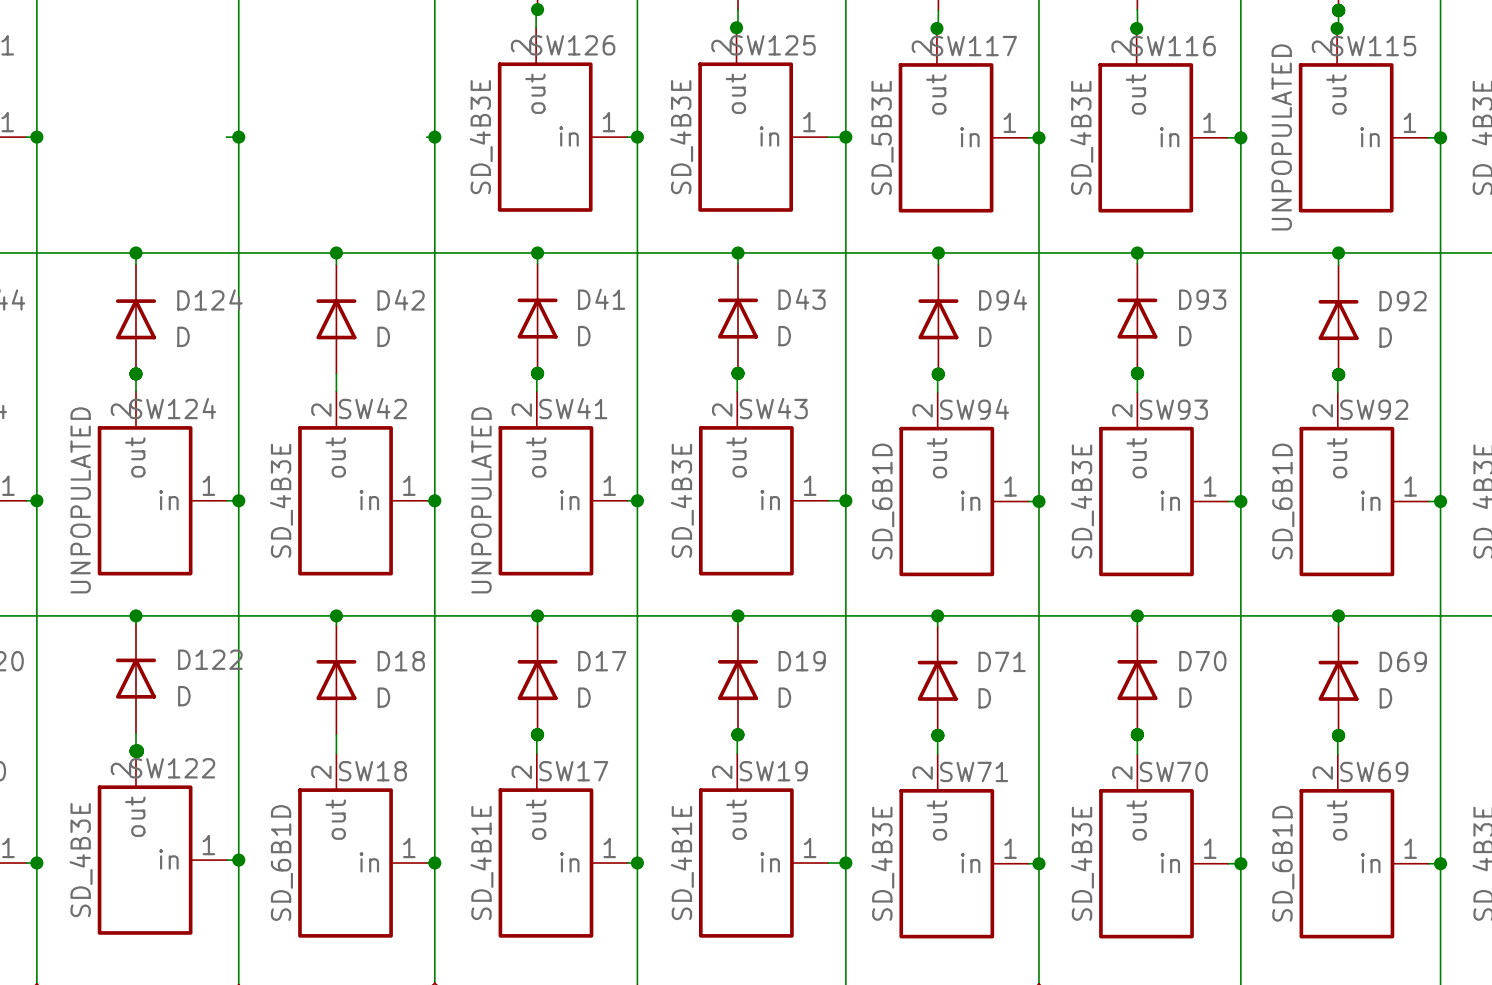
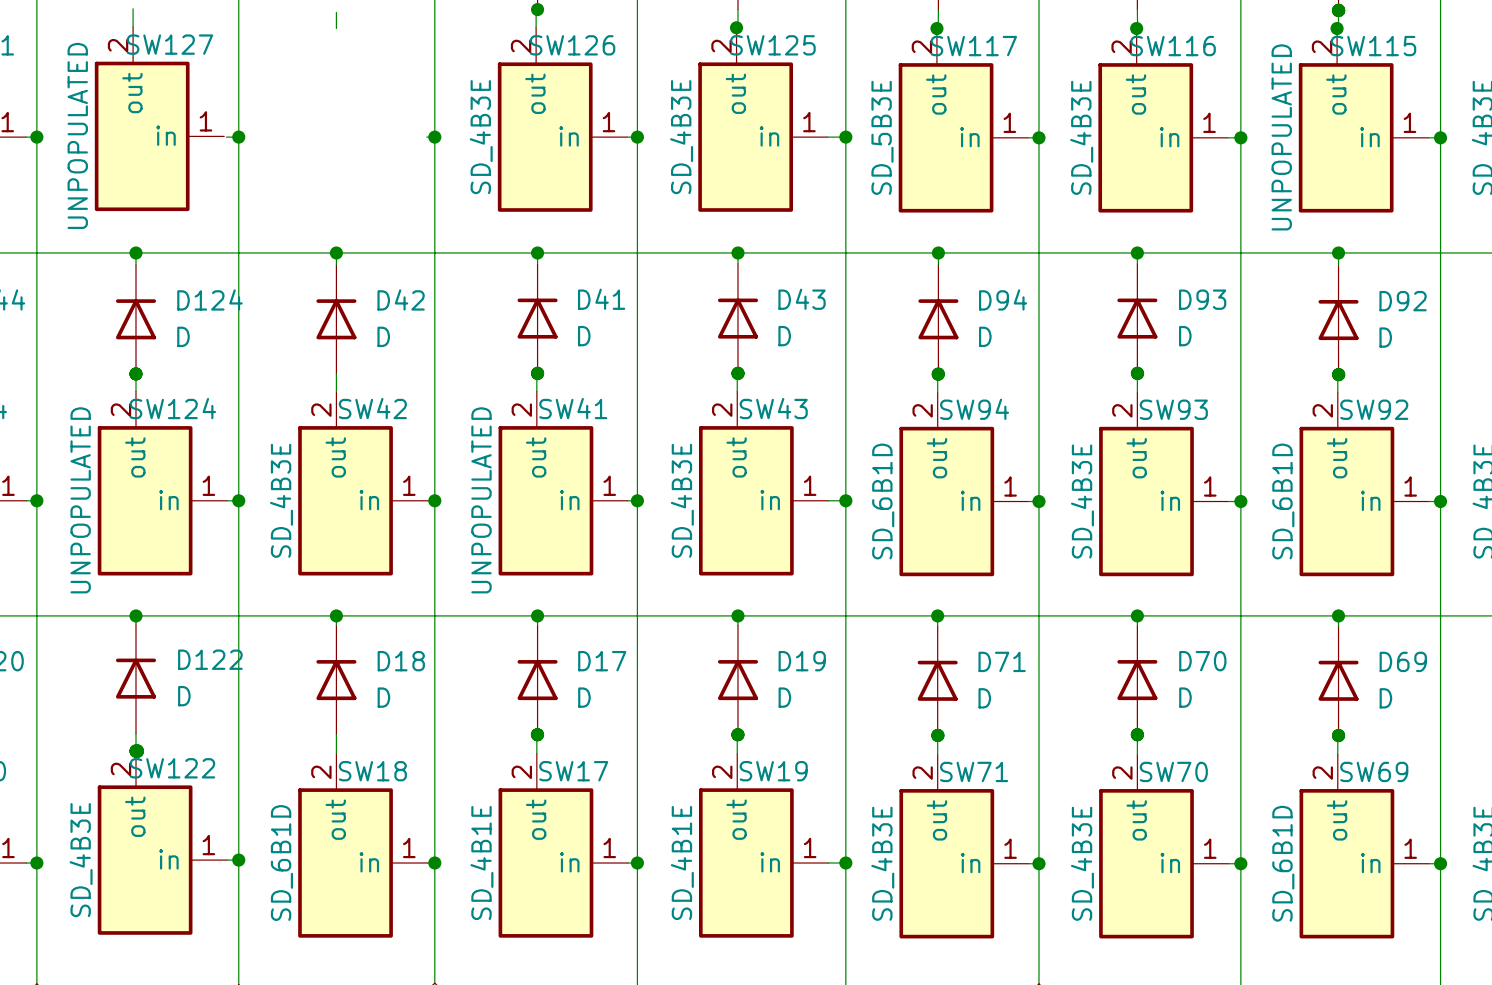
wire: none -> (133, 8) (133, 27)
wire: none -> (336, 12) (336, 28)
SW127: none -> UNPOPULATED (159, 119)

